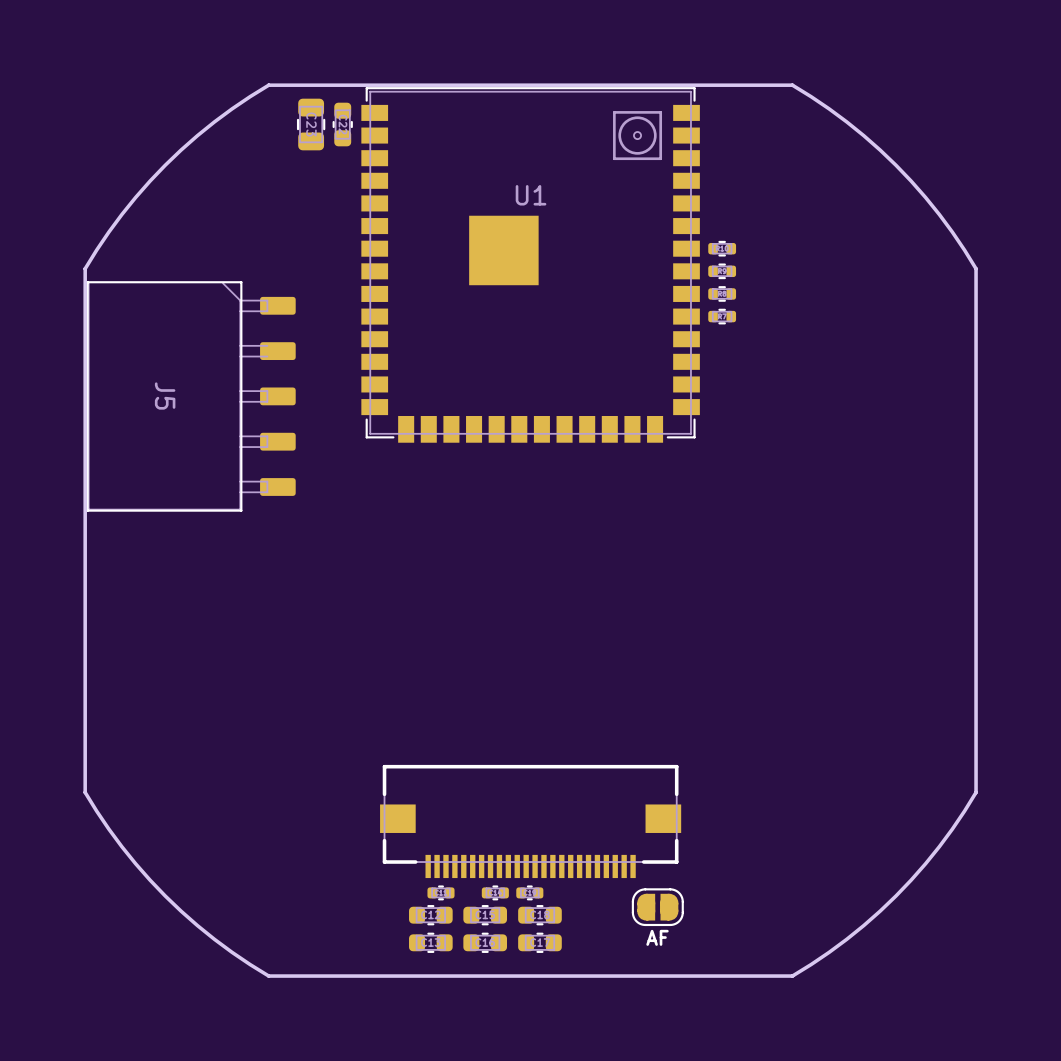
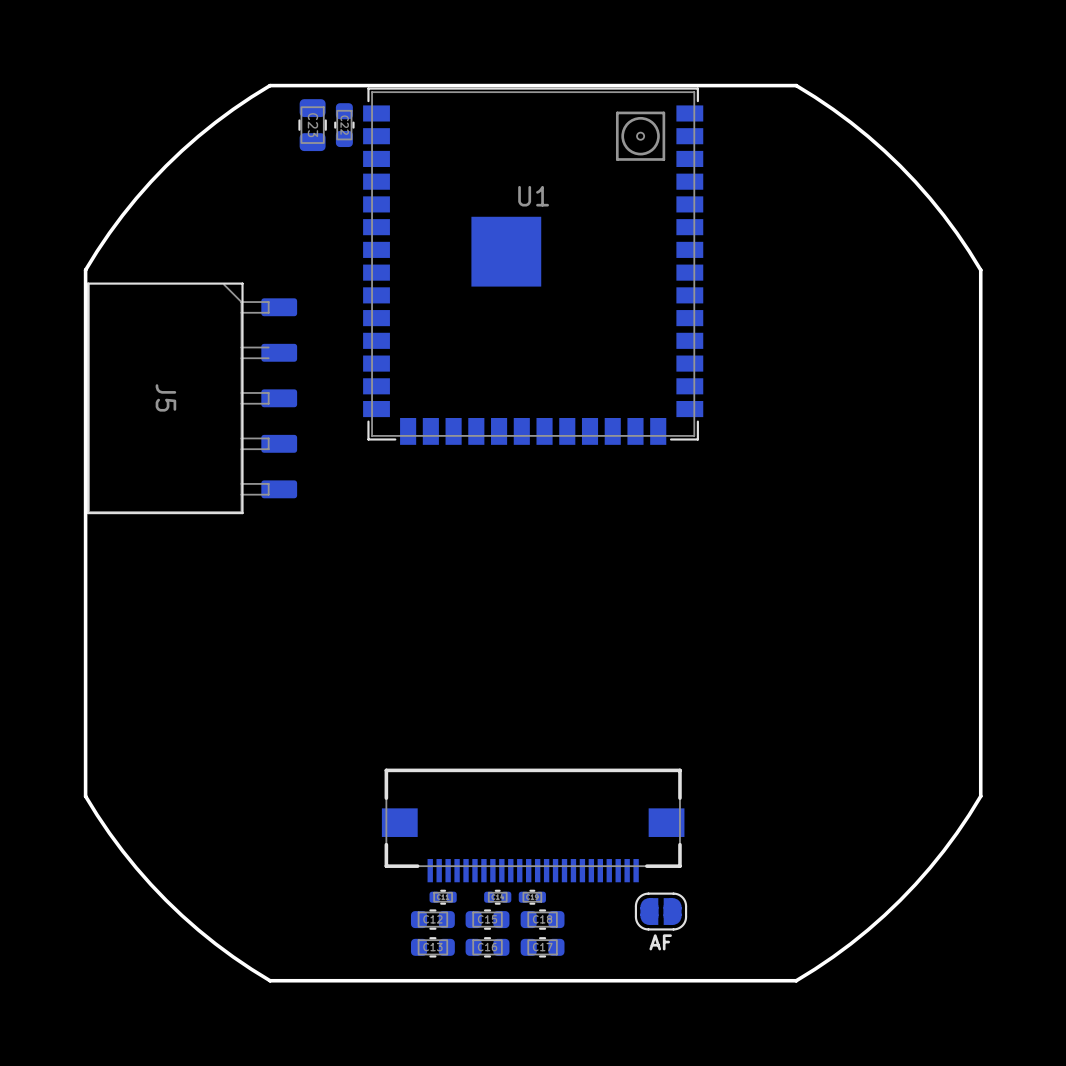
part: (722, 248) -> none
part: (722, 271) -> none
part: (722, 293) -> none
part: (722, 316) -> none

